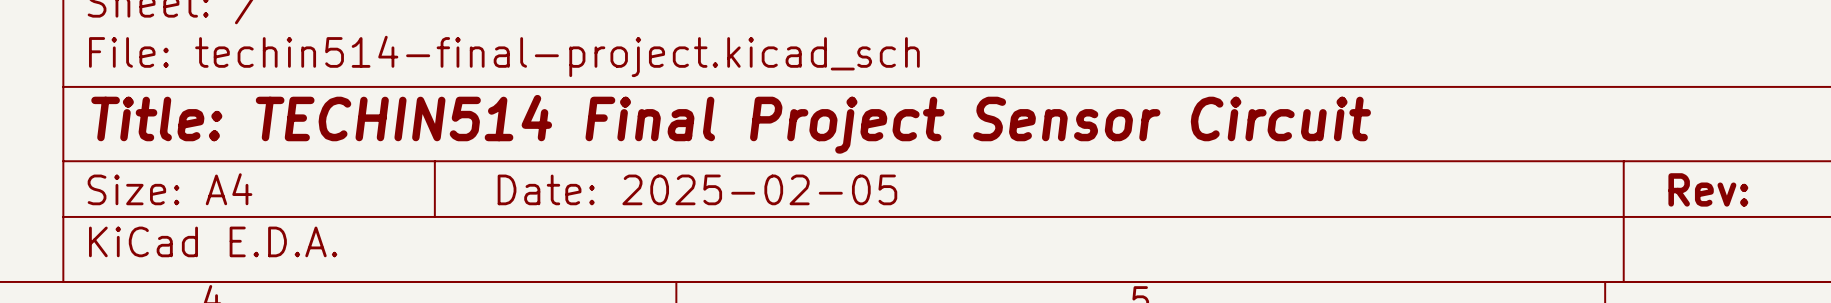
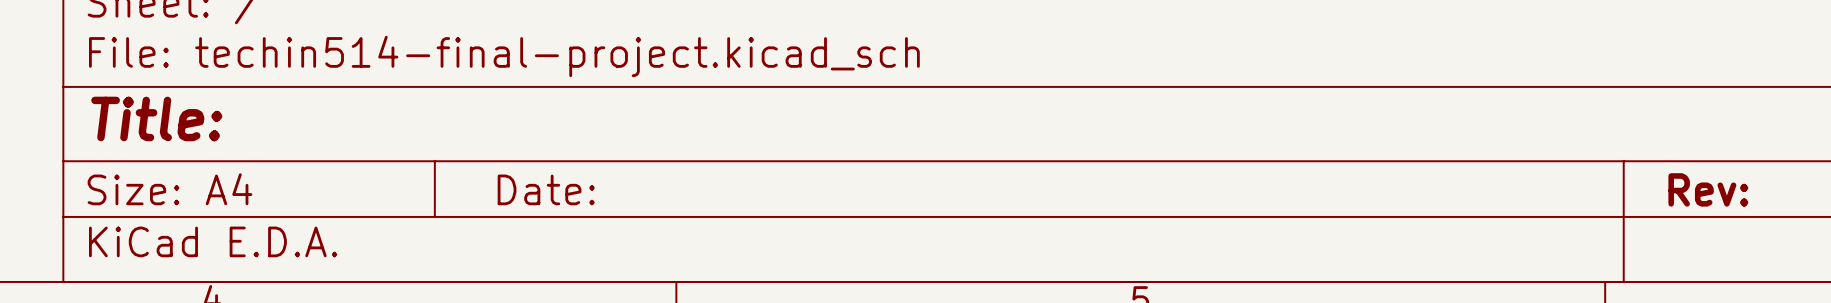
title block: Title: TECHIN514 Final Project Sensor Circuit (731, 124) -> Title: (156, 118)
title block: Date: 2025-02-05 (697, 189) -> Date: (546, 189)

